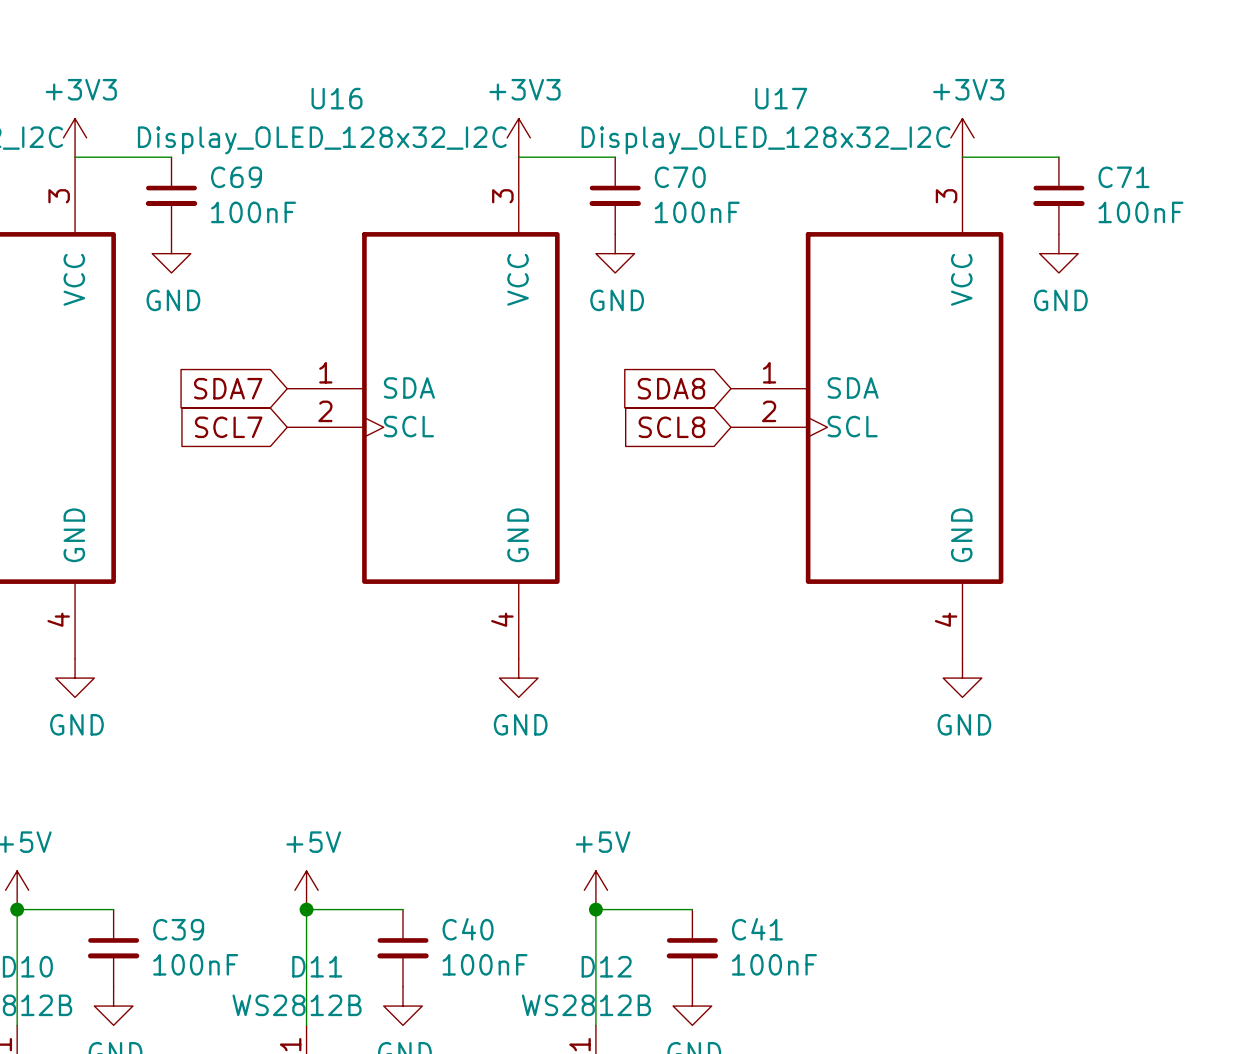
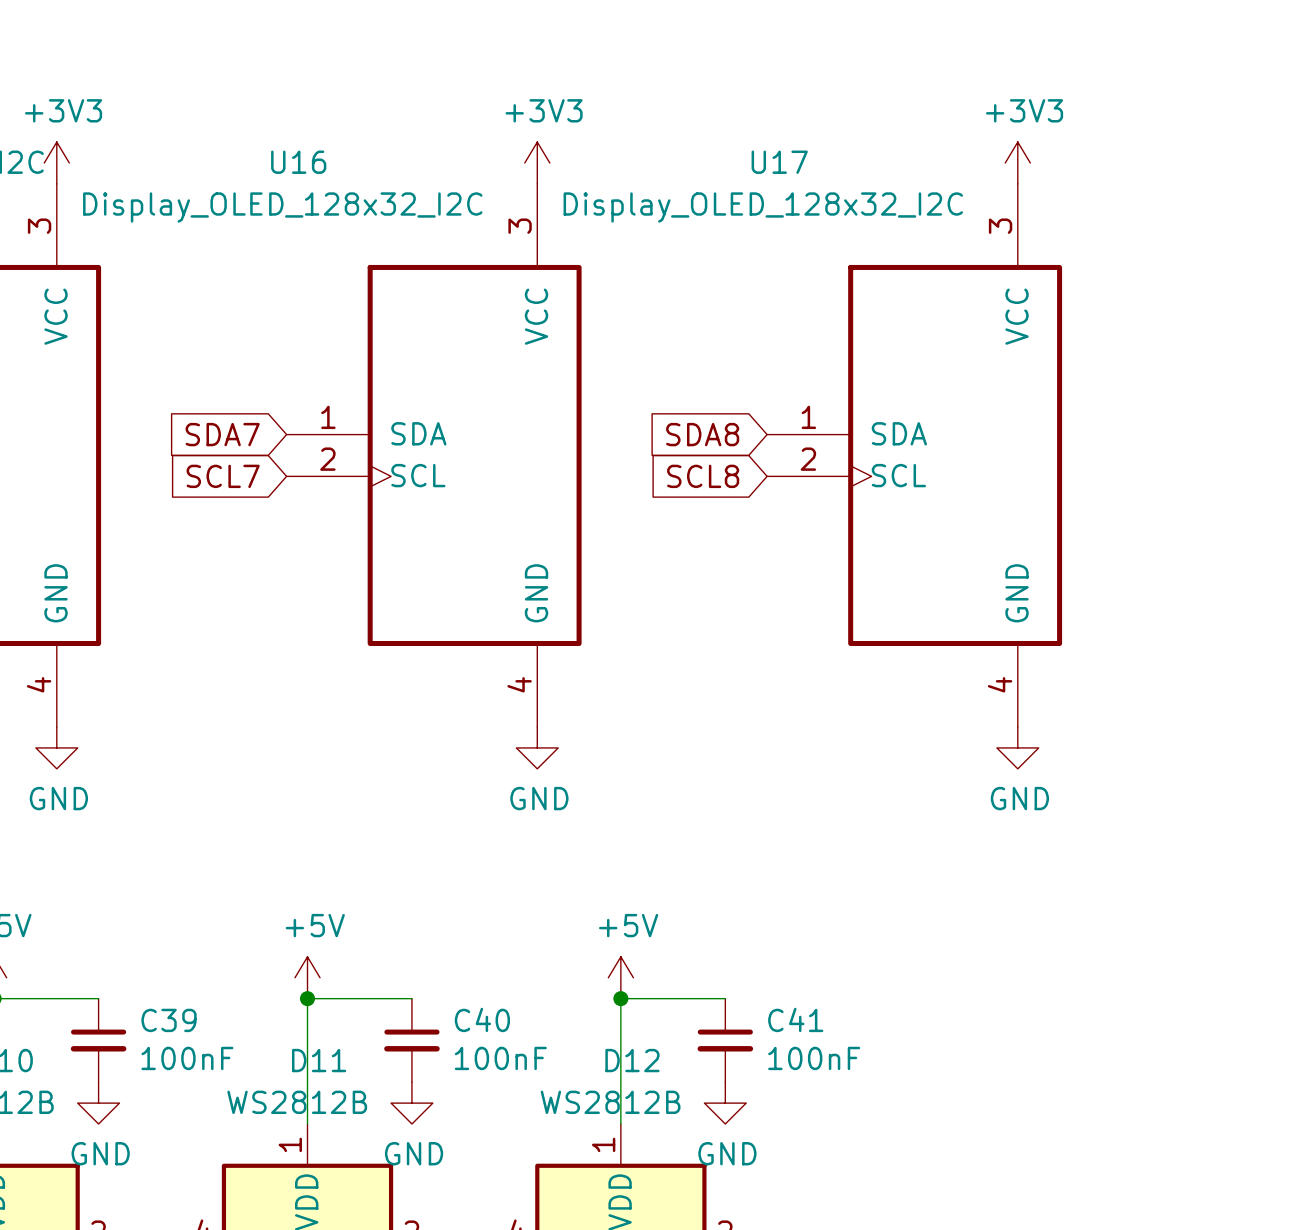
U16 name position: U16 (337, 98) -> U16 (298, 162)
U17 name position: U17 (781, 98) -> U17 (779, 162)
U16 value position: Display_OLED_128x32_I2C (322, 140) -> Display_OLED_128x32_I2C (282, 207)
U17 value position: Display_OLED_128x32_I2C (766, 140) -> Display_OLED_128x32_I2C (763, 207)
wire: (75, 157) (171, 157) -> none
wire: (518, 157) (615, 157) -> none
wire: (962, 157) (1058, 157) -> none
C69: 100nF (171, 195) -> none
C70: 100nF (615, 195) -> none
C71: 100nF (1058, 195) -> none
power symbol: GND (171, 253) -> none
power symbol: GND (615, 253) -> none
power symbol: GND (1058, 253) -> none

